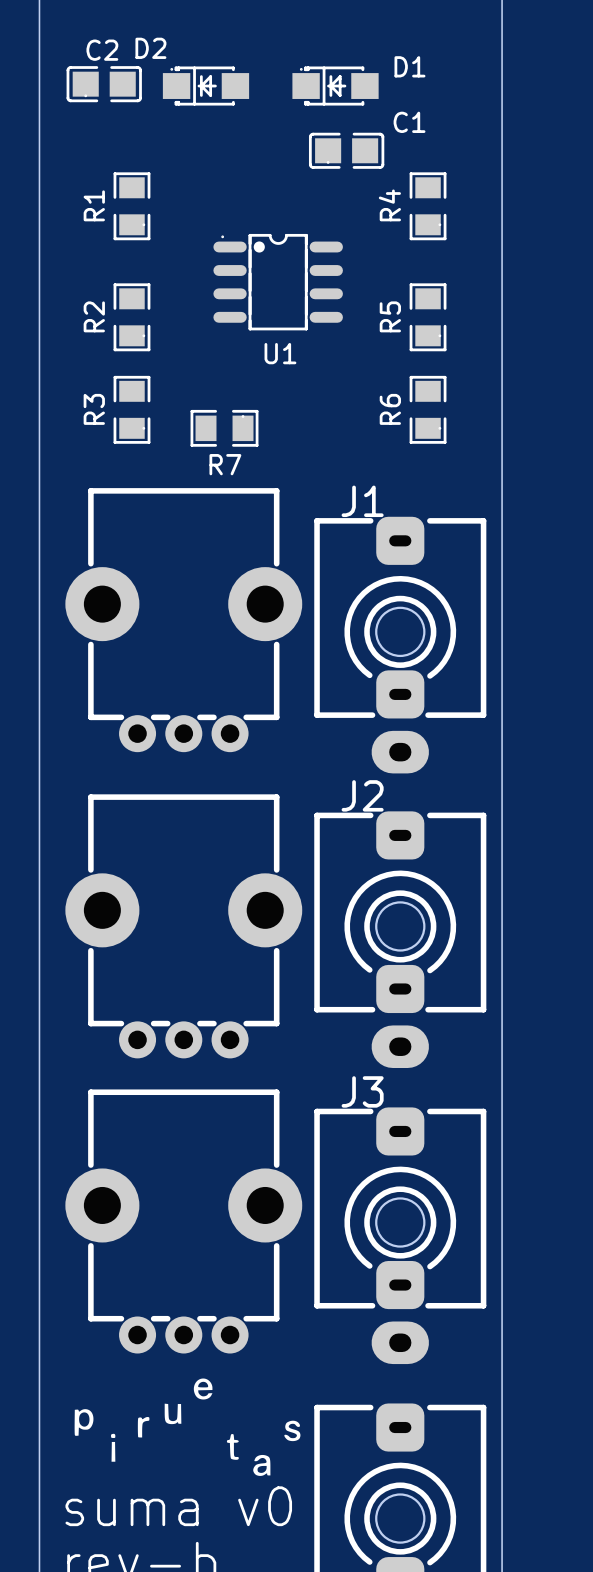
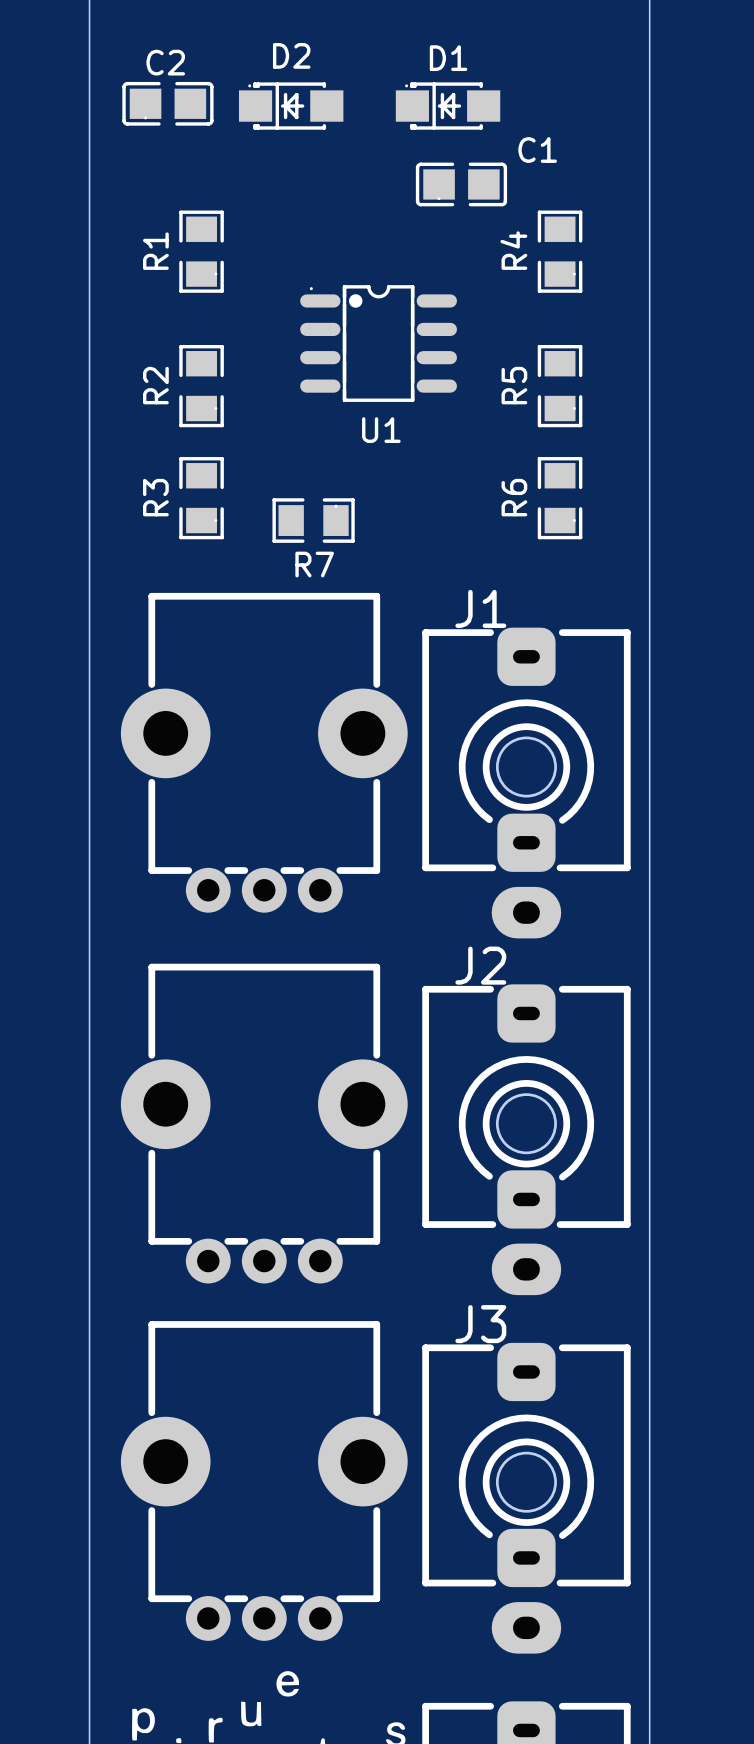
D2 name position: D2 (150, 48) -> D2 (291, 55)
D1 name position: D1 (409, 66) -> D1 (448, 58)

